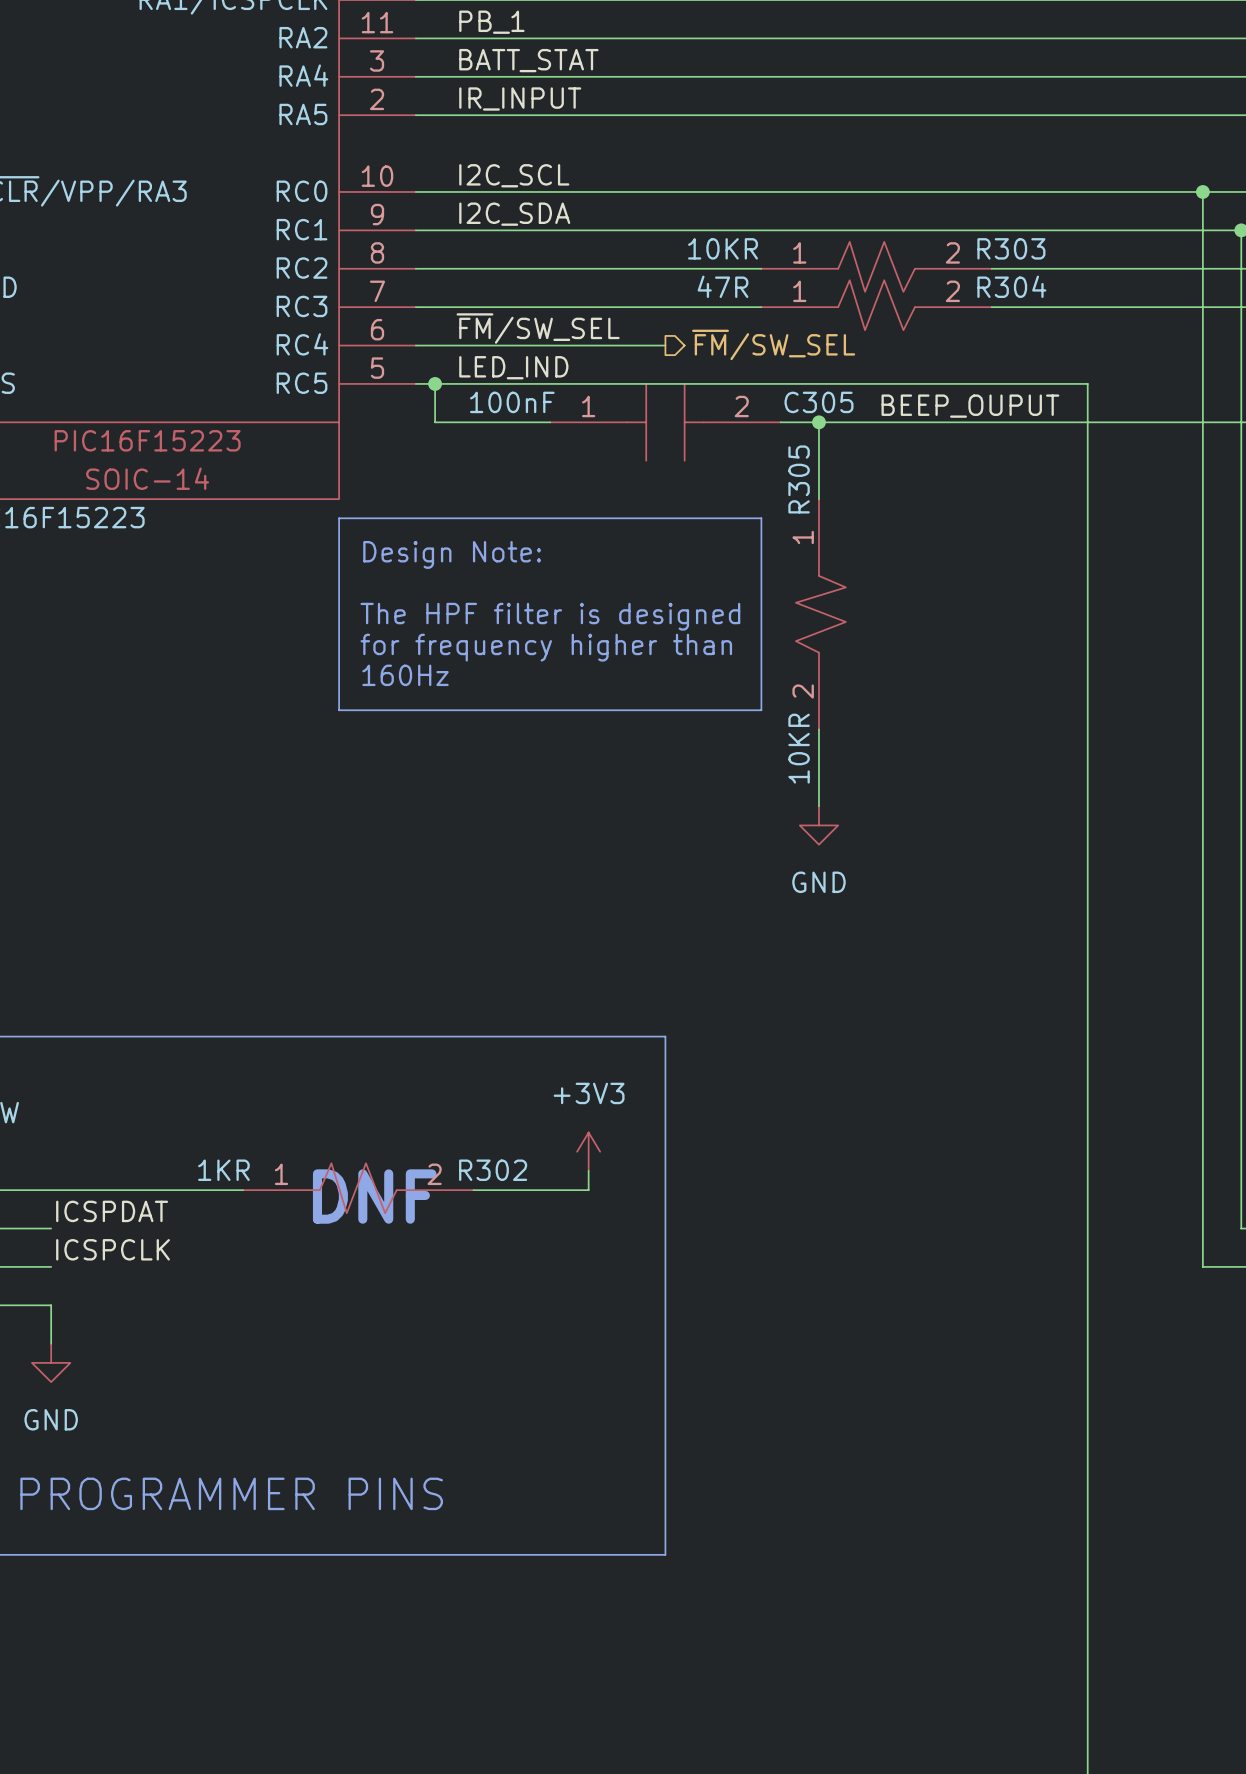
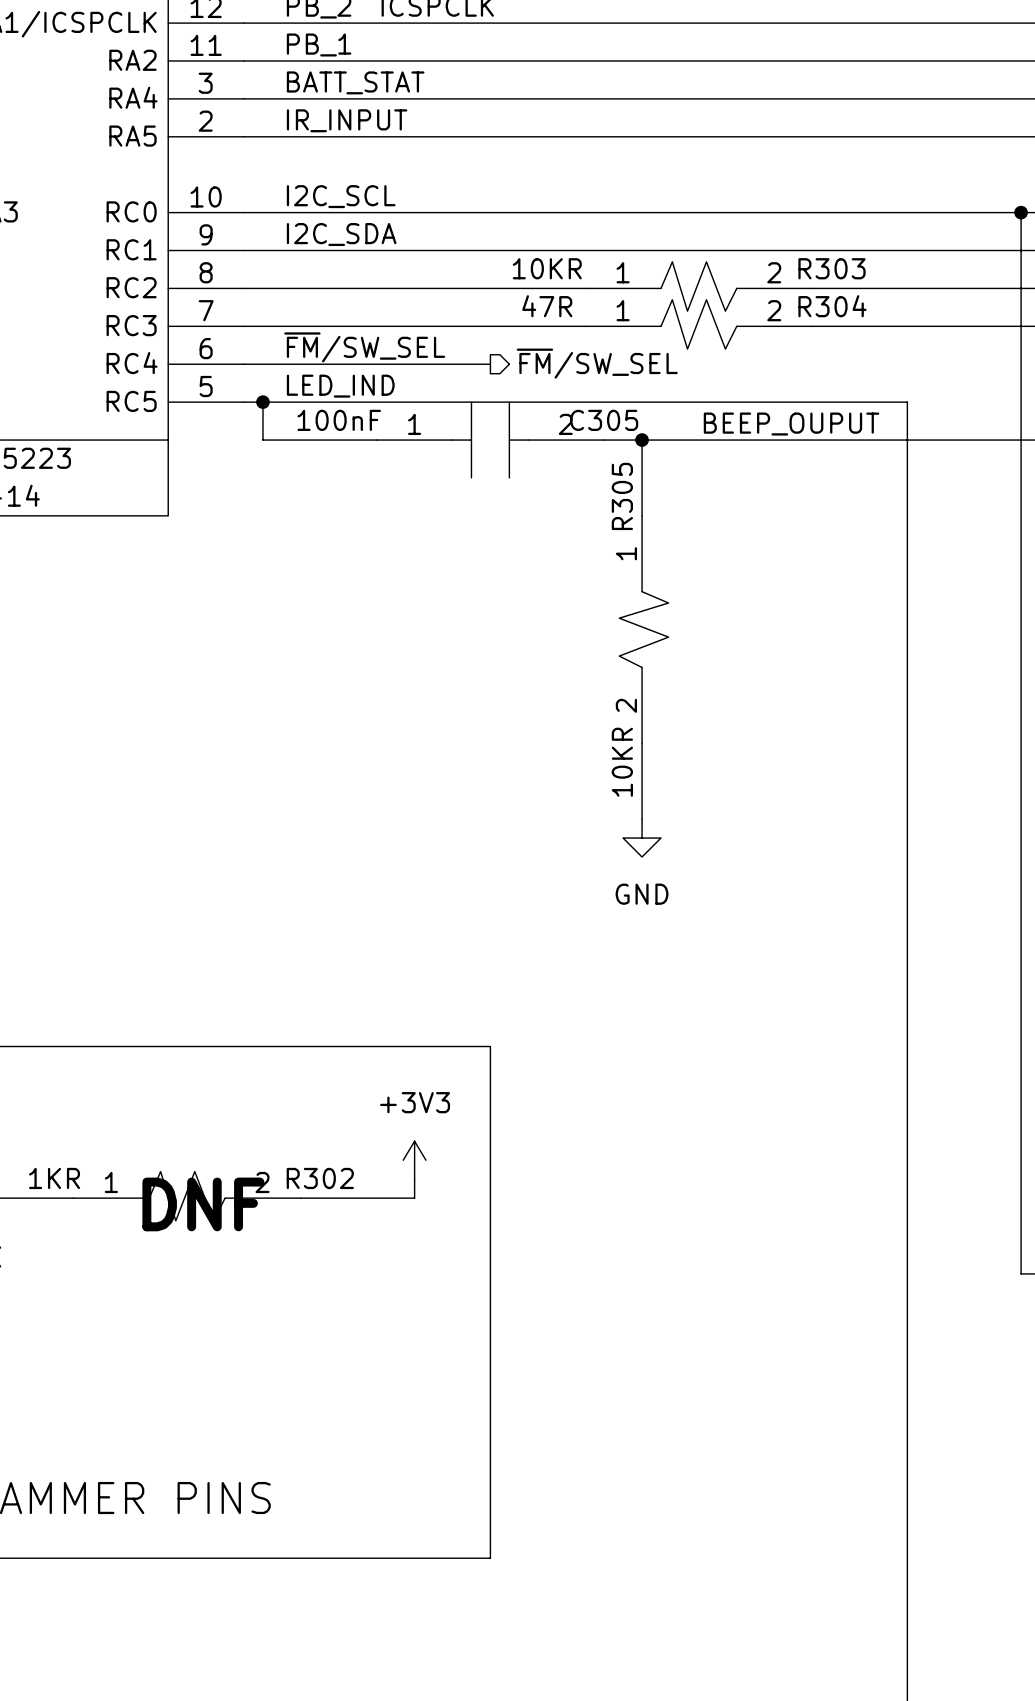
C305 name position: C305 (818, 402) -> C305 (604, 420)
line: (339, 518) (339, 710) (761, 710) (761, 518) (339, 518) -> none
text: Design Note: (452, 554) -> none
text: The HPF filter is designed (550, 616) -> none
text: for frequency higher than (546, 647) -> none
text: 160Hz (405, 675) -> none

